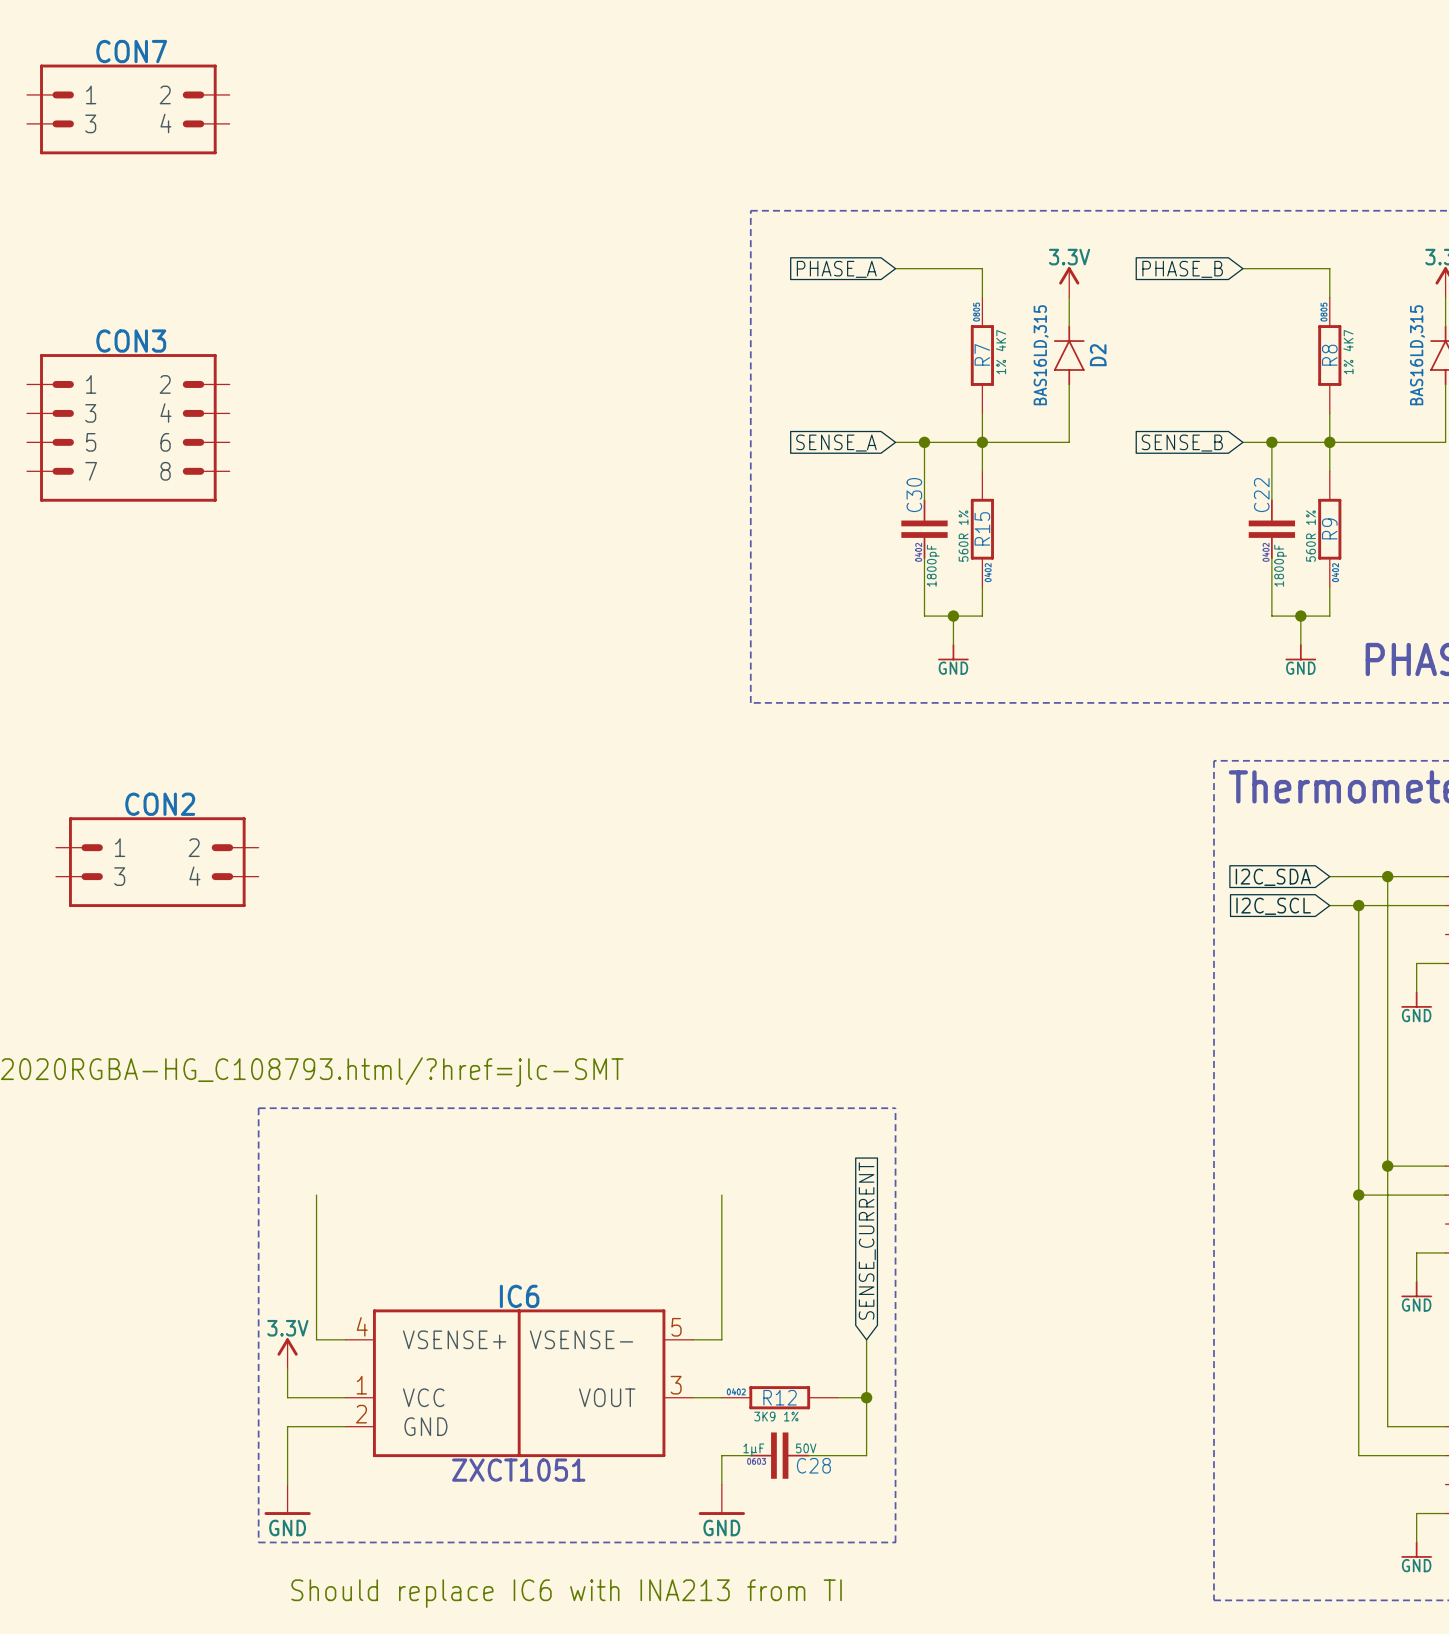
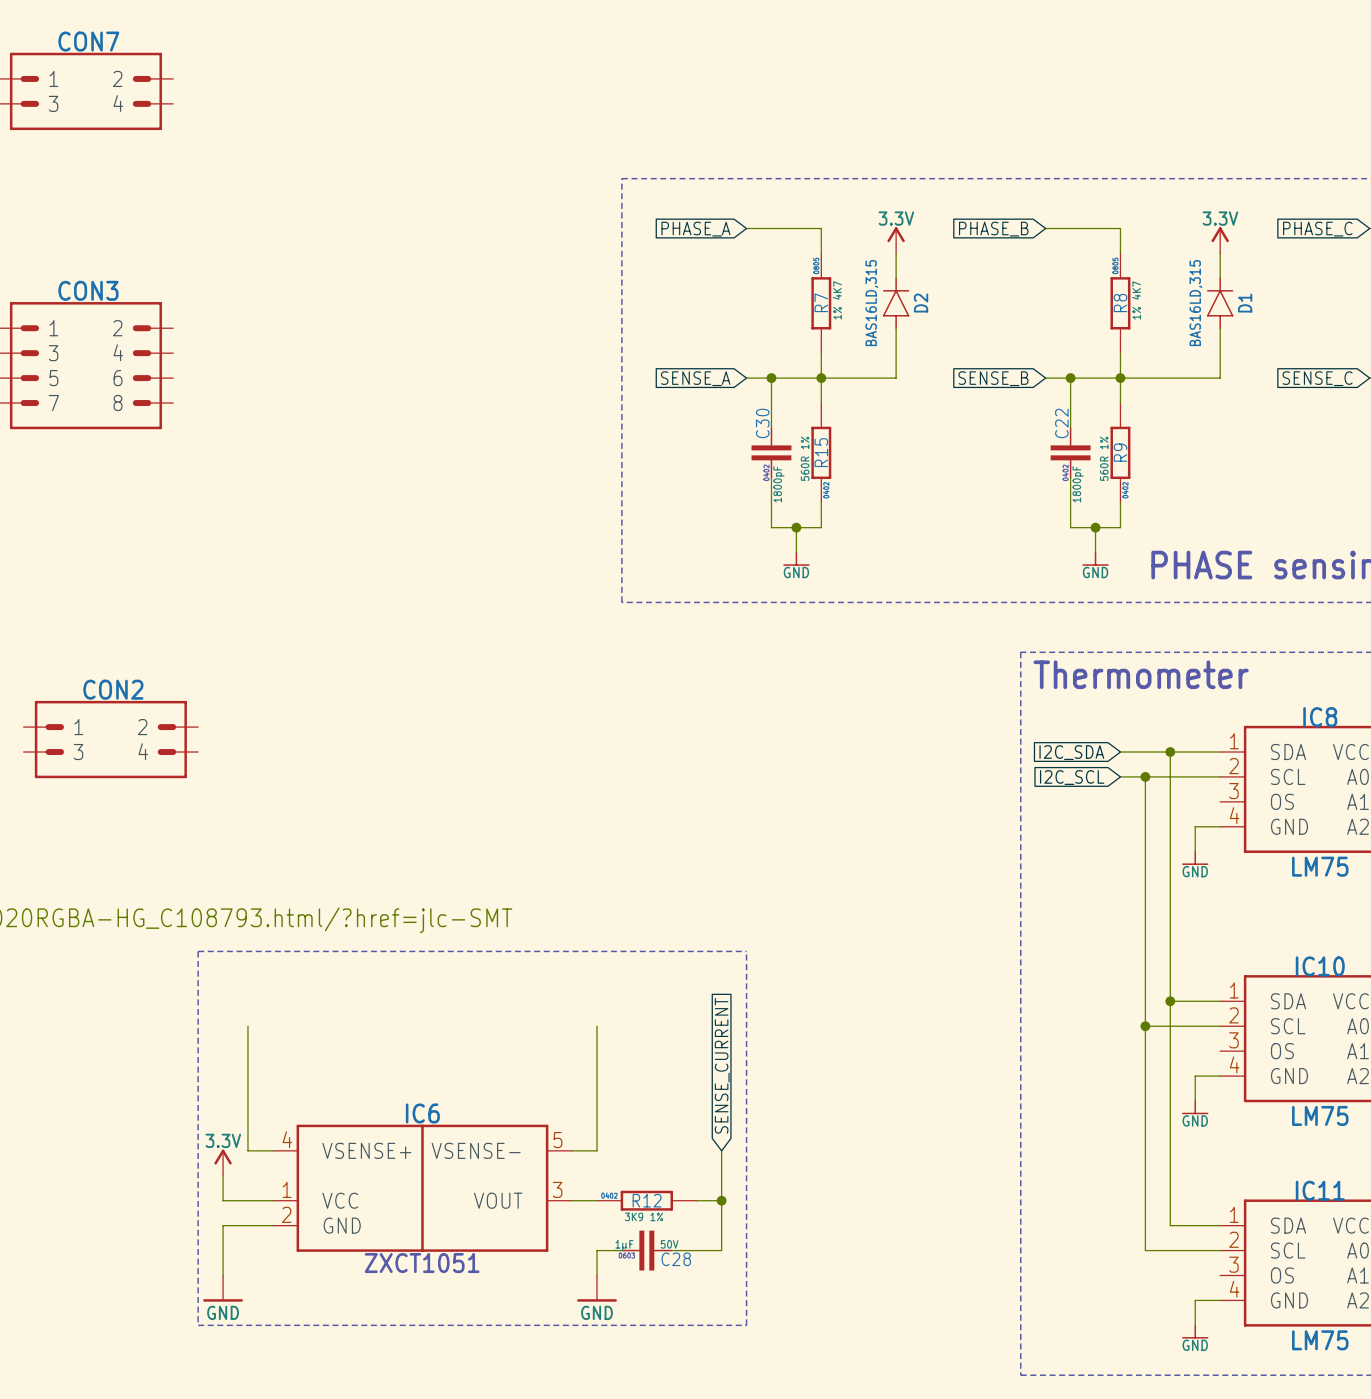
text: Should replace IC6 with INA213 from TI (566, 1593) -> none

